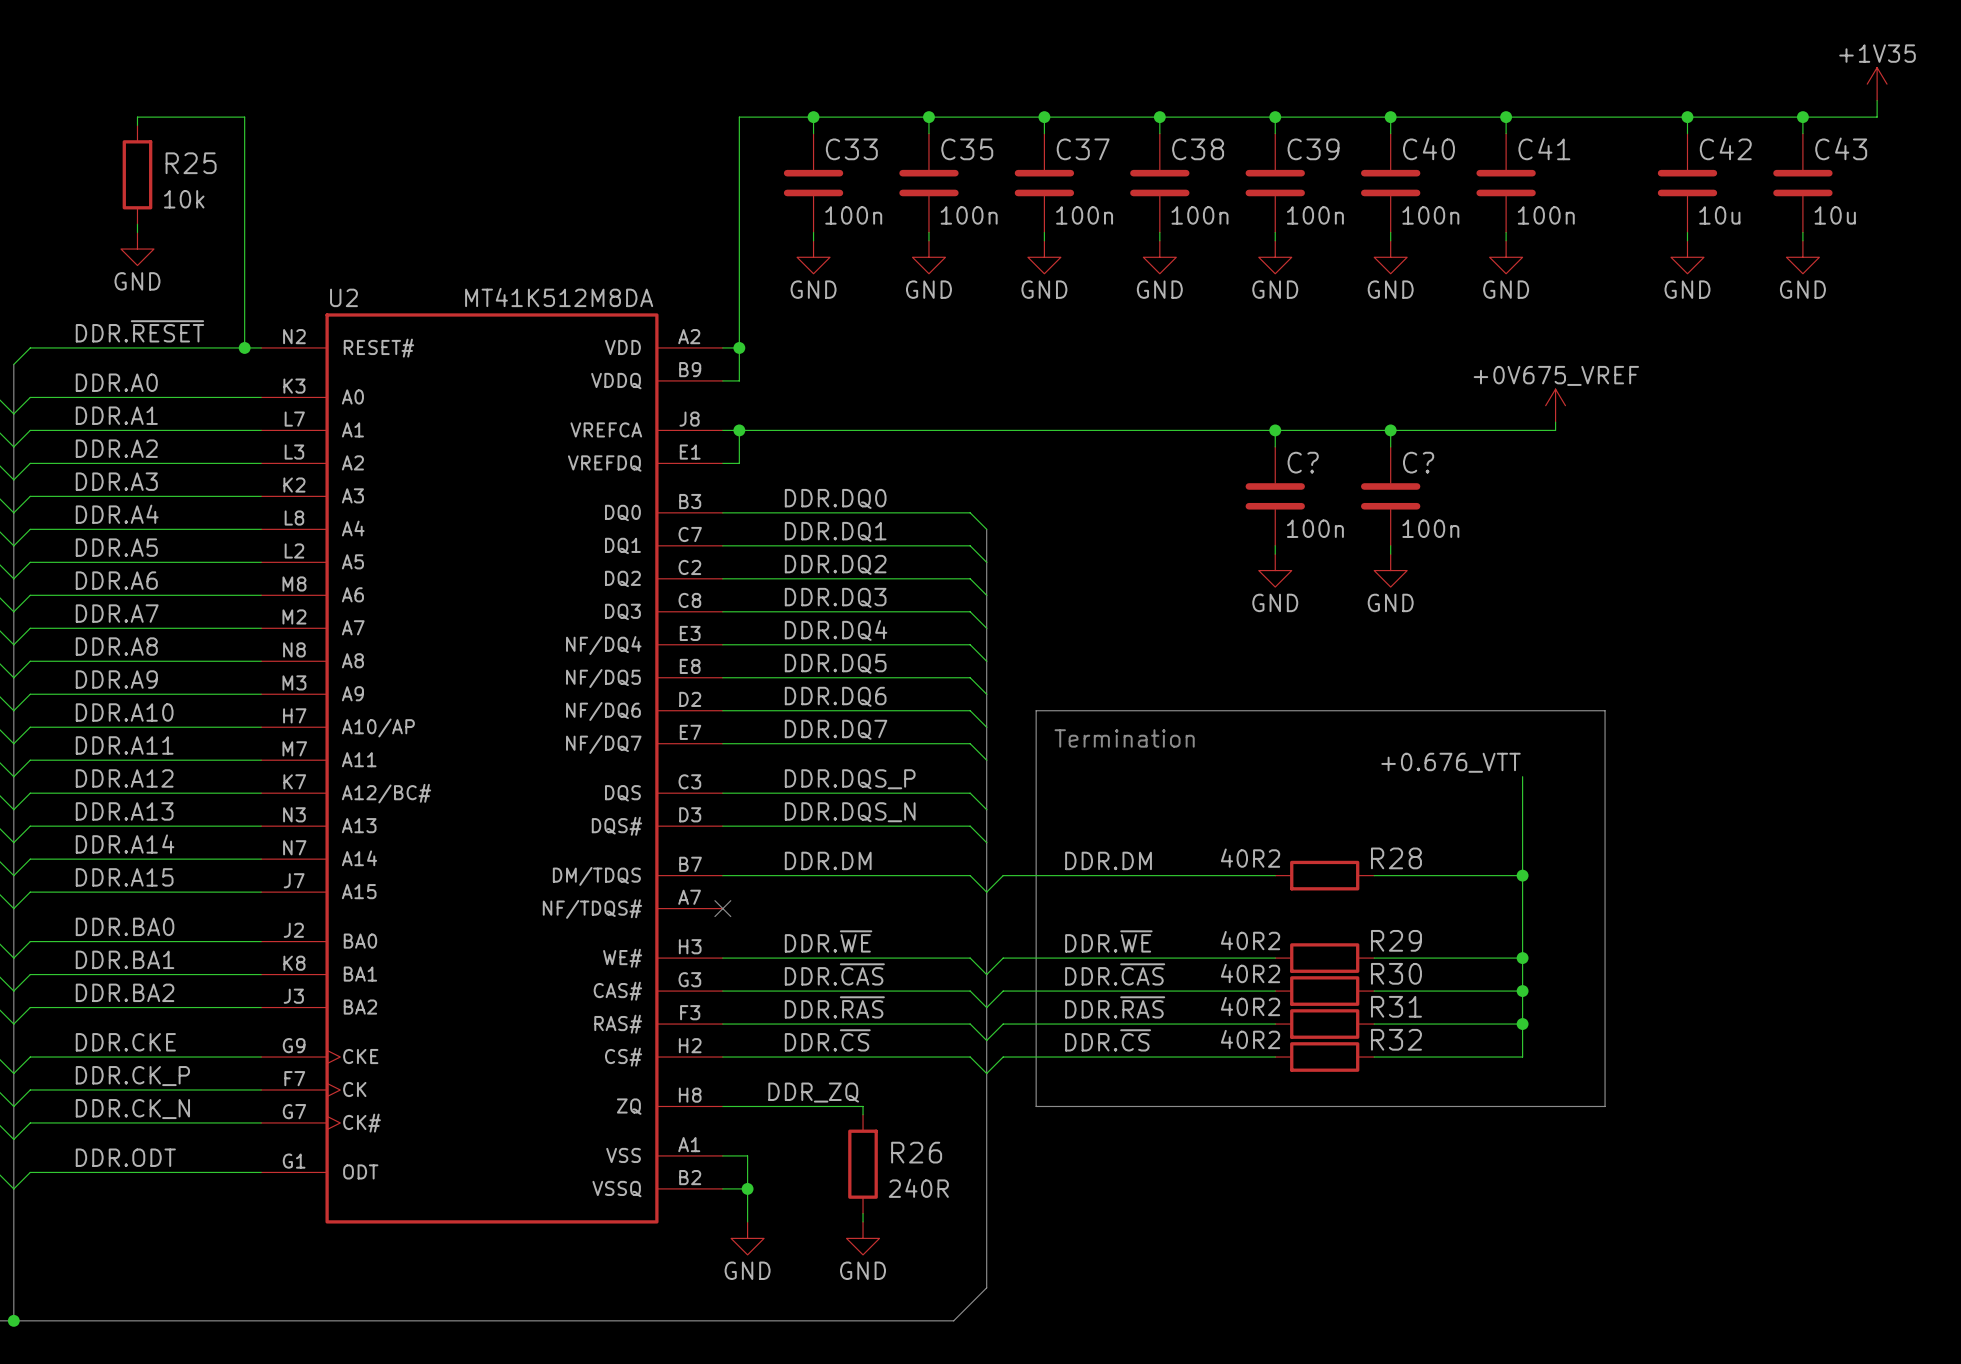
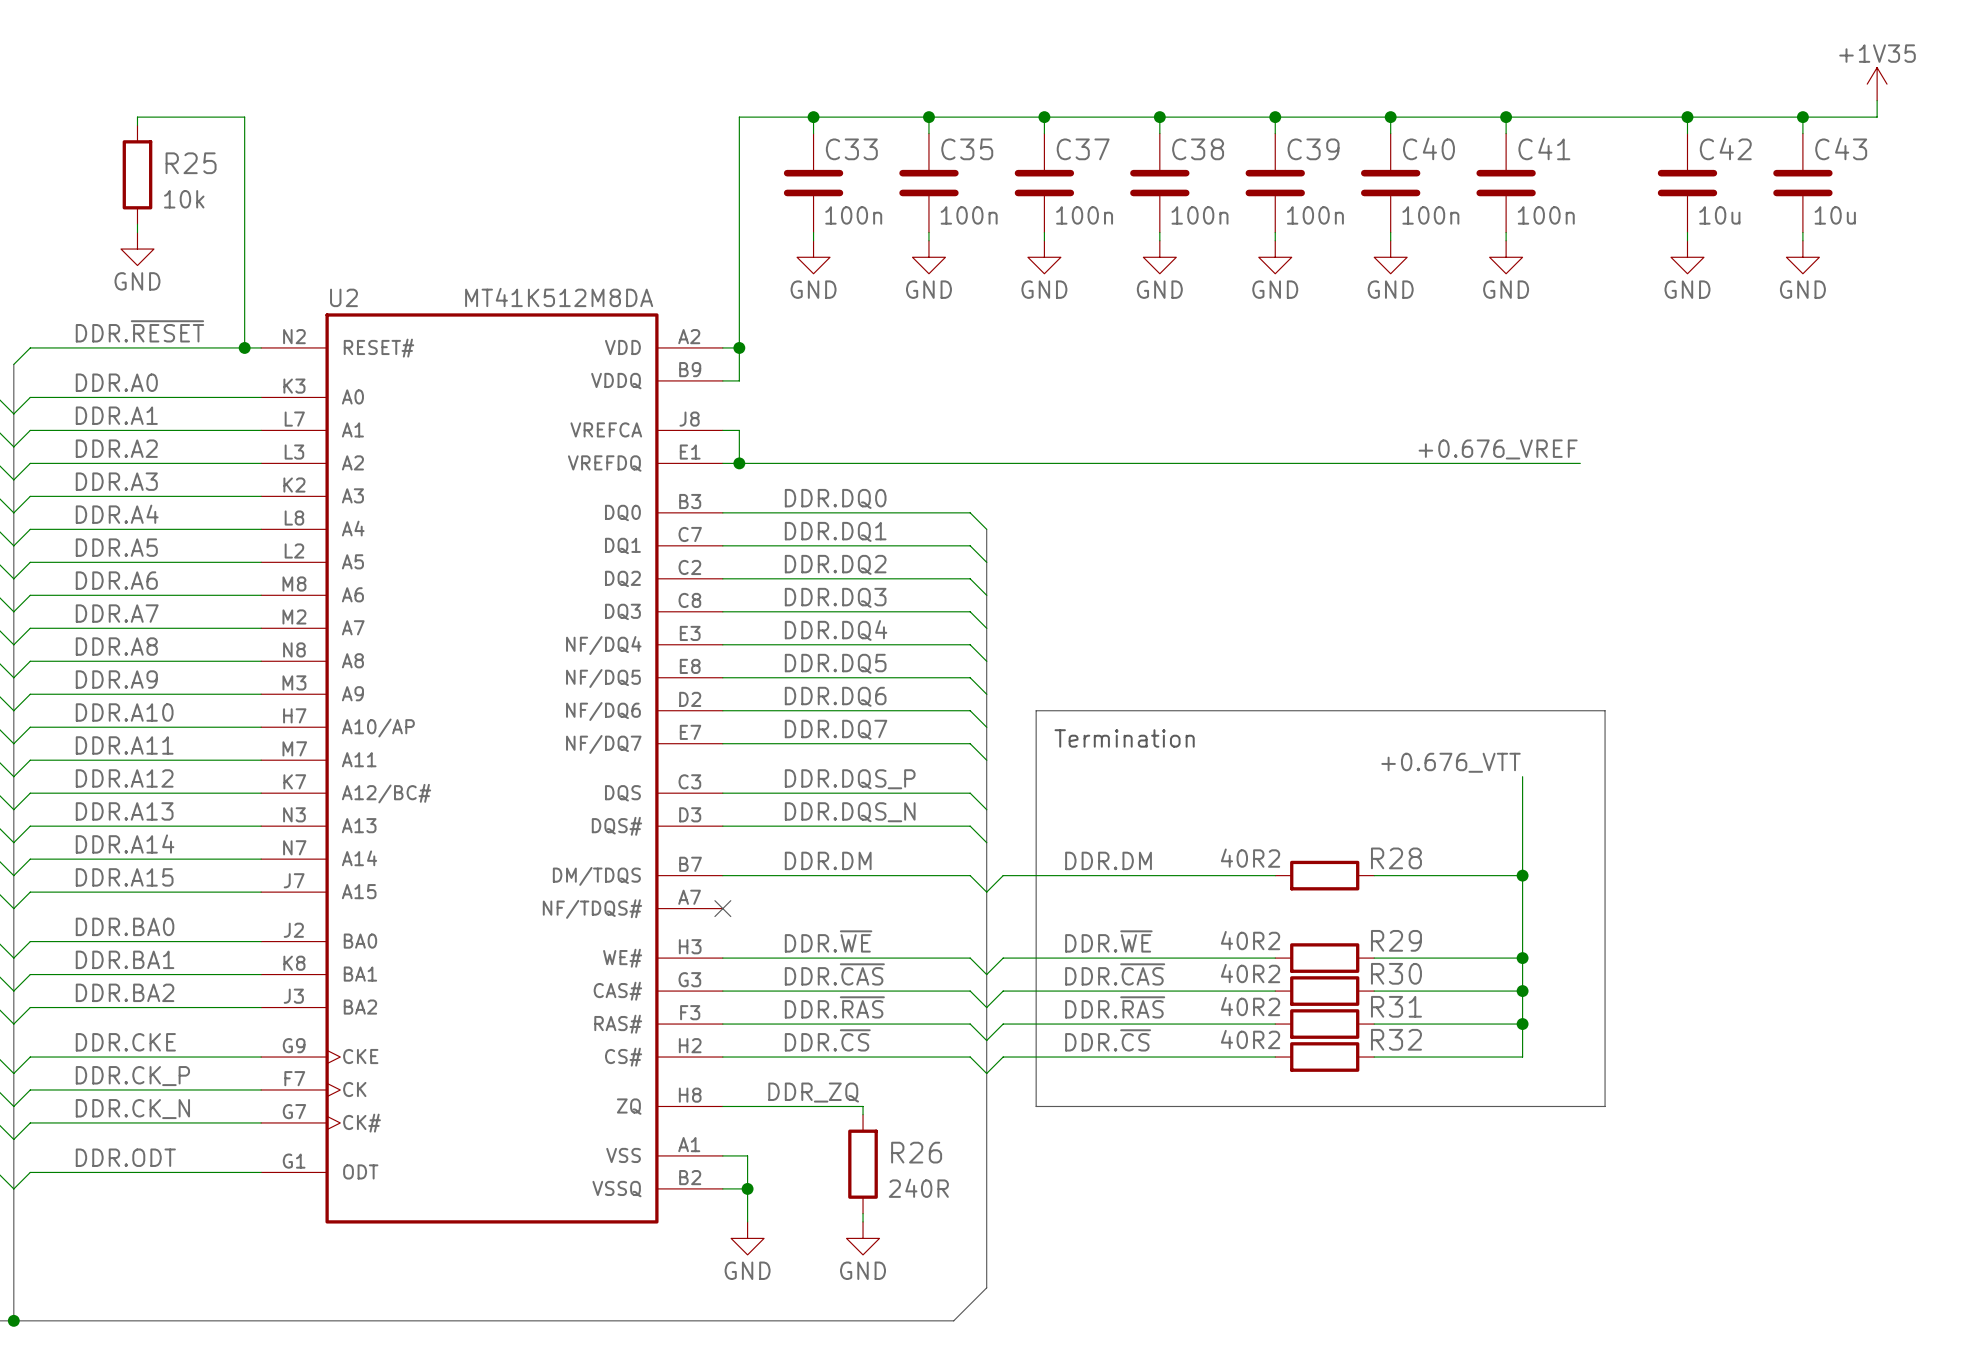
power symbol: +0V675_VREF (1555, 405) -> none
wire: (1555, 422) (1555, 430) (739, 430) -> none
junction position: (739, 430) -> (739, 463)
wire: (1275, 430) (1275, 446) -> none
junction: (1275, 430) -> none
wire: (1390, 430) (1390, 446) -> none
junction: (1390, 430) -> none
label: none -> +0.676_VREF (1498, 449)
wire: none -> (739, 463) (1580, 463)
C?: (1275, 496) -> none
C?: (1390, 496) -> none
wire: (1275, 545) (1275, 554) -> none
wire: (1390, 545) (1390, 554) -> none
power symbol: GND (1275, 570) -> none
power symbol: GND (1390, 570) -> none

